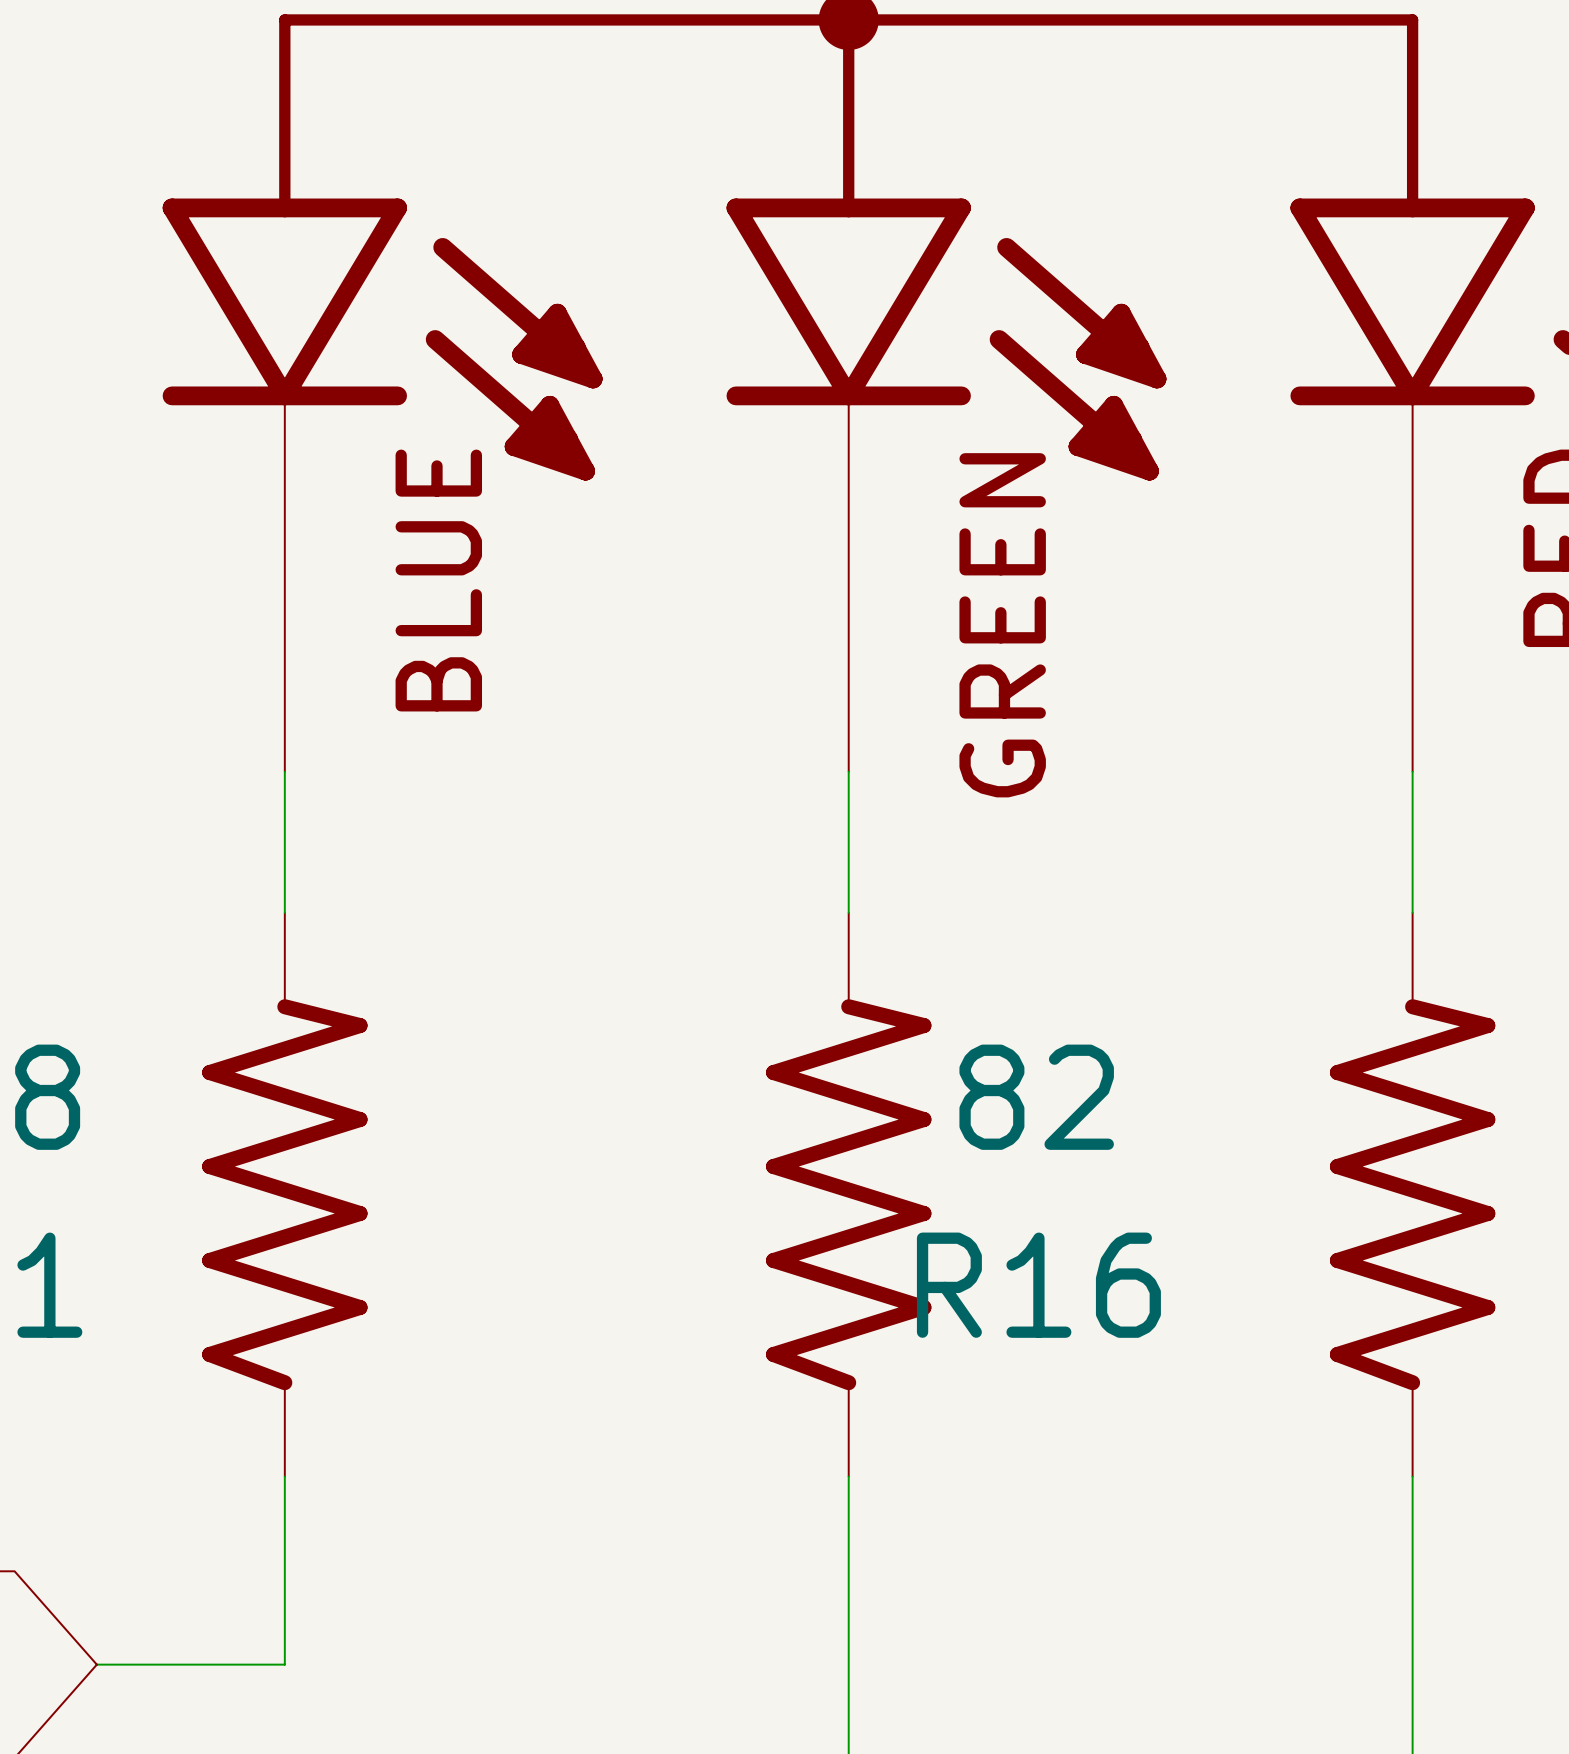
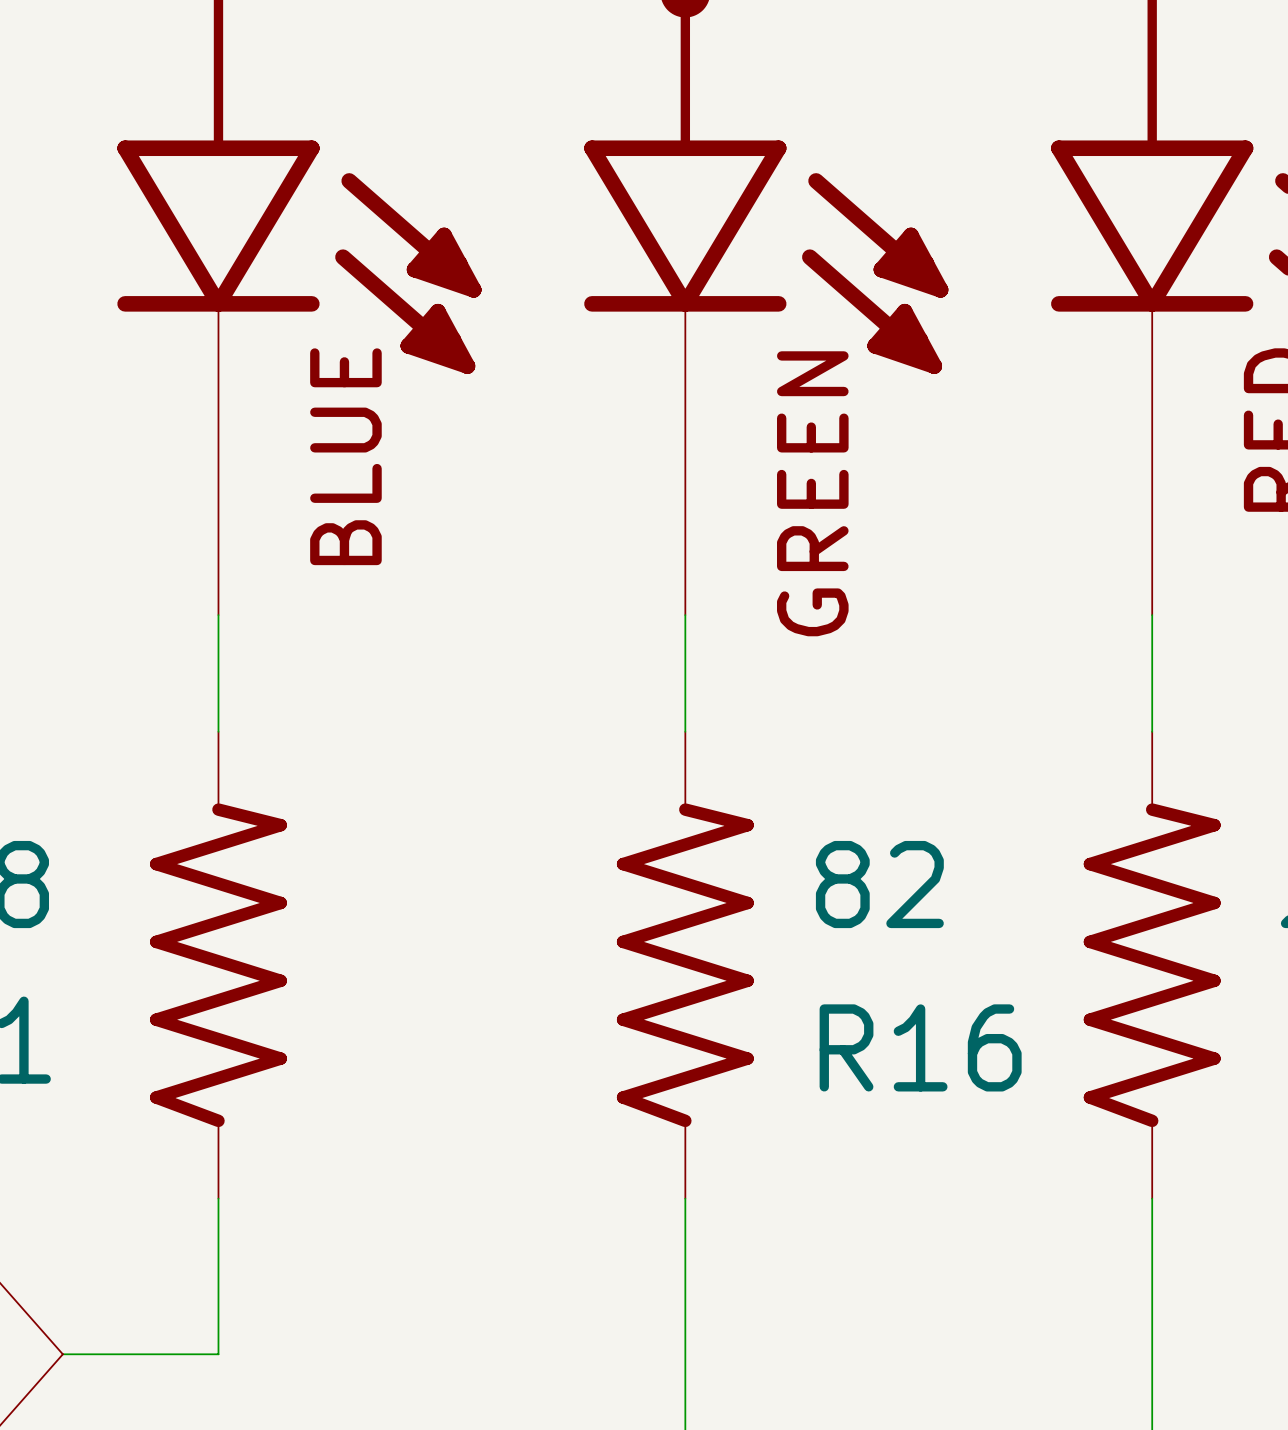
R16 value position: 82 (1036, 1097) -> 82 (879, 884)
R16 name position: R16 (1038, 1285) -> R16 (920, 1047)

